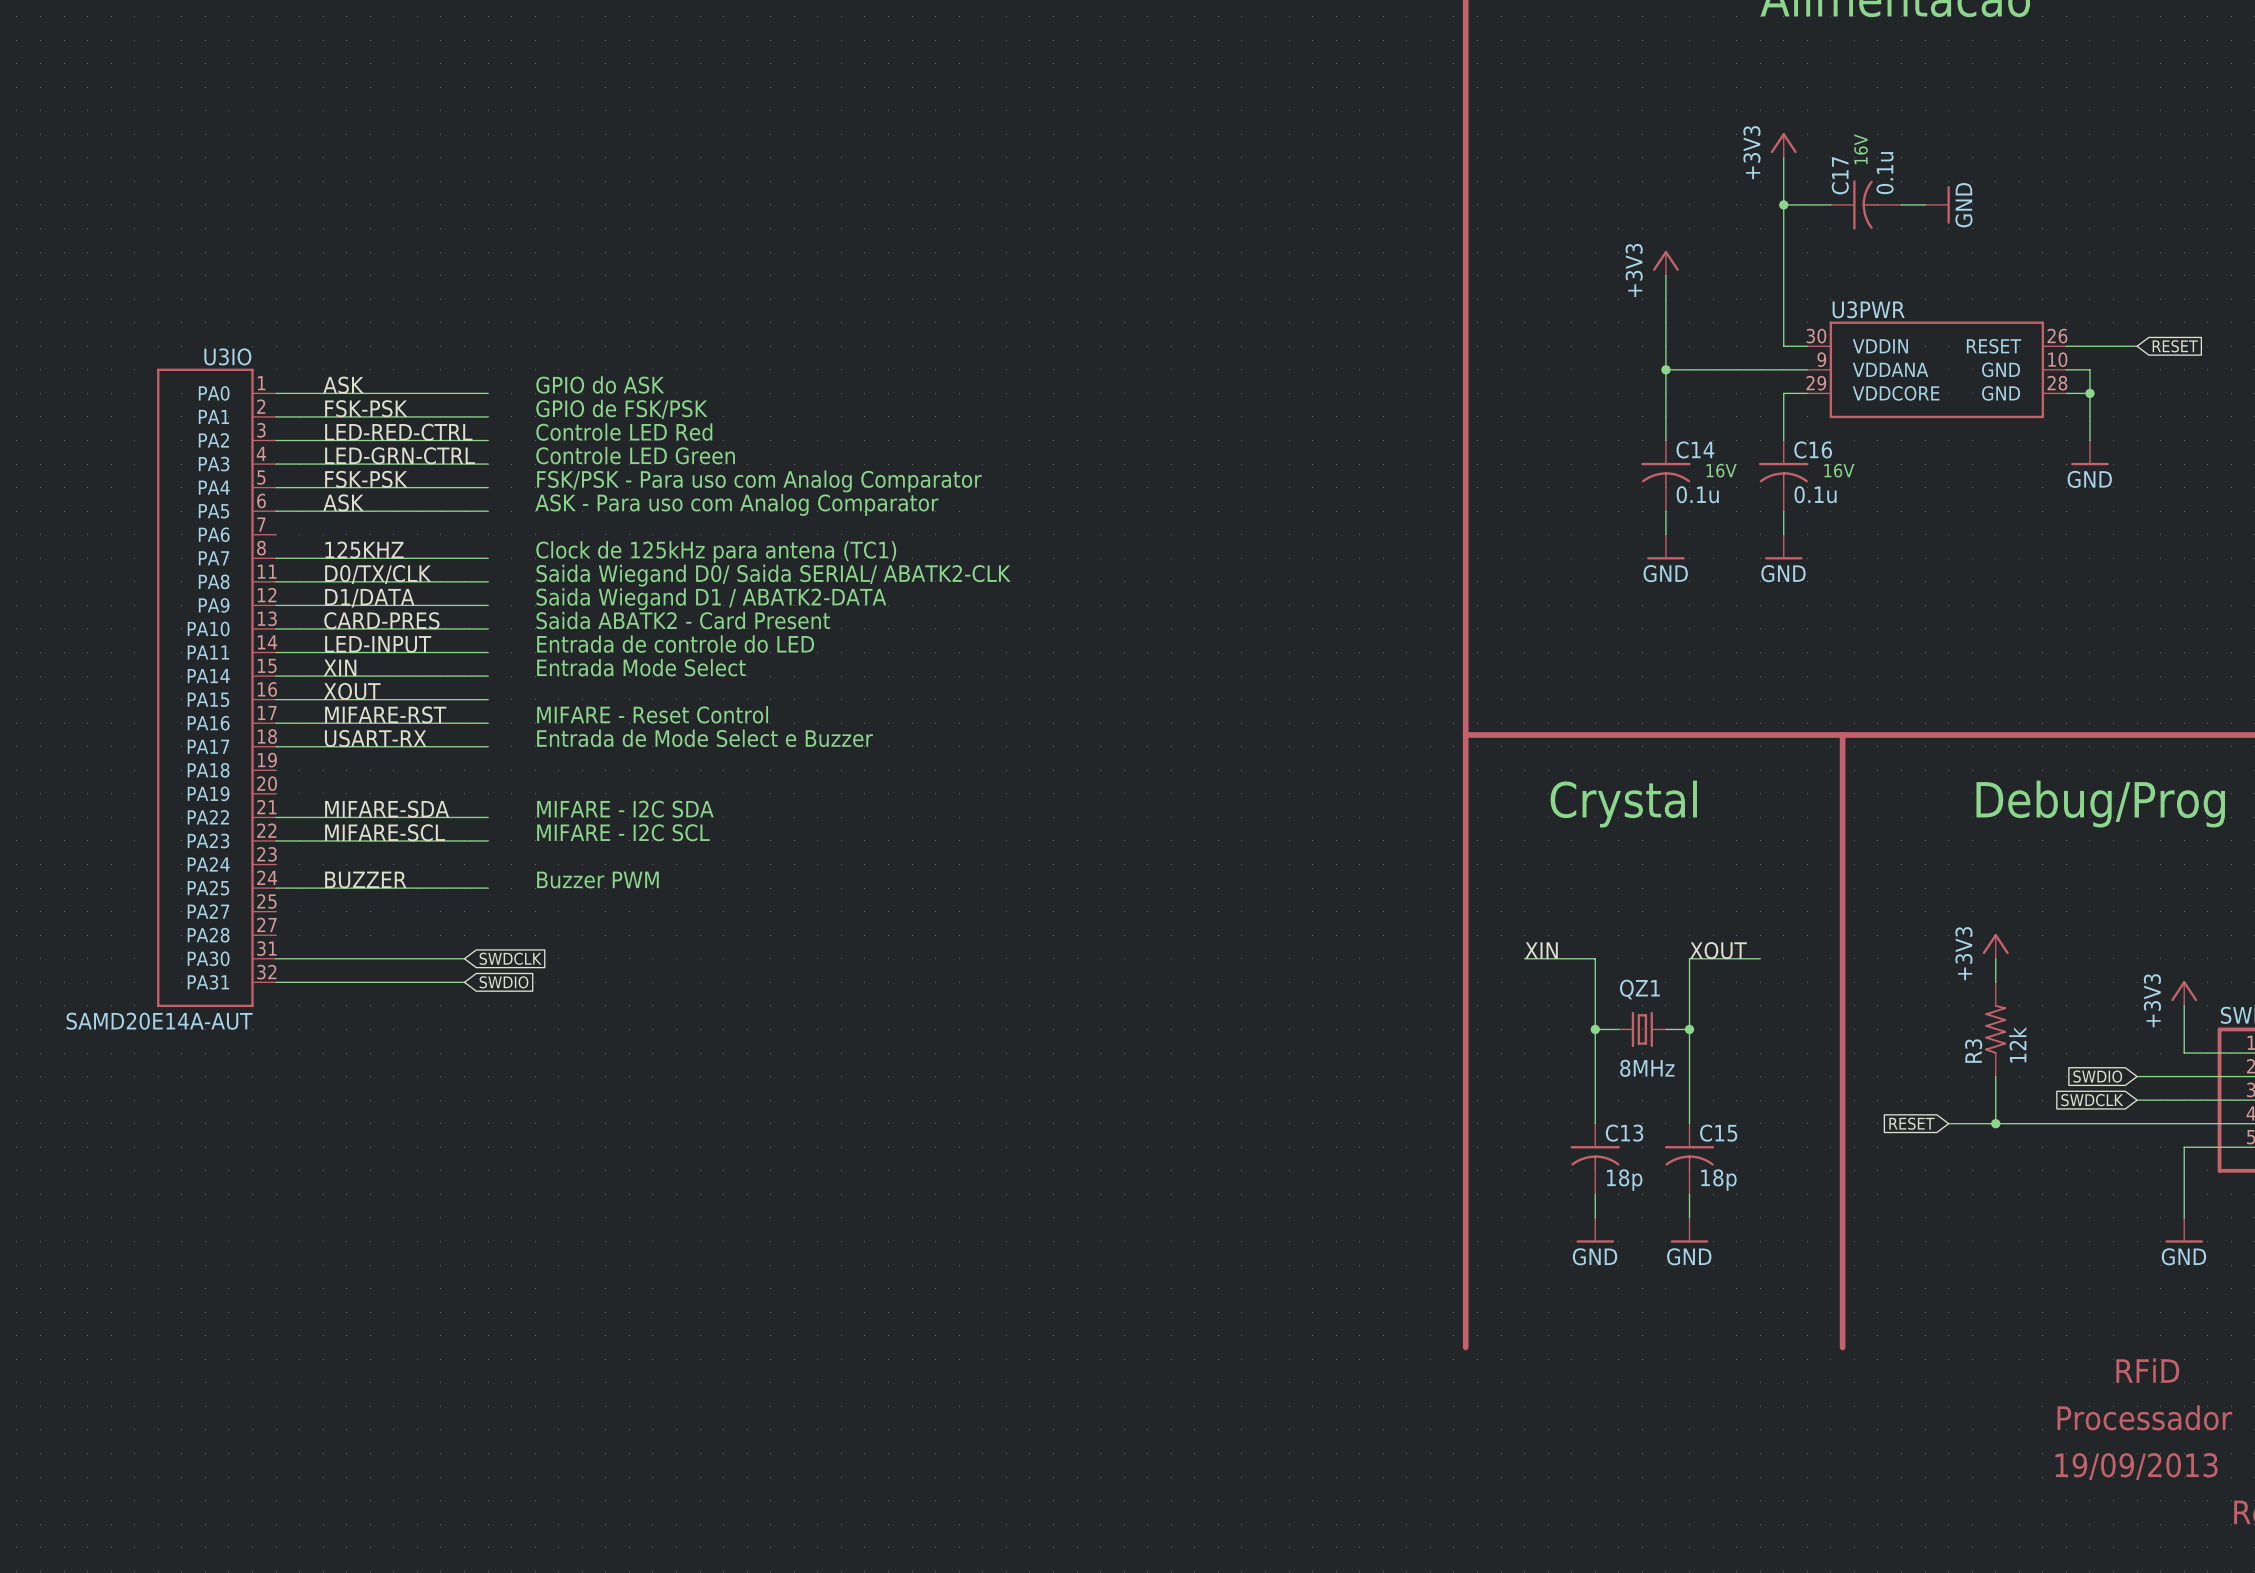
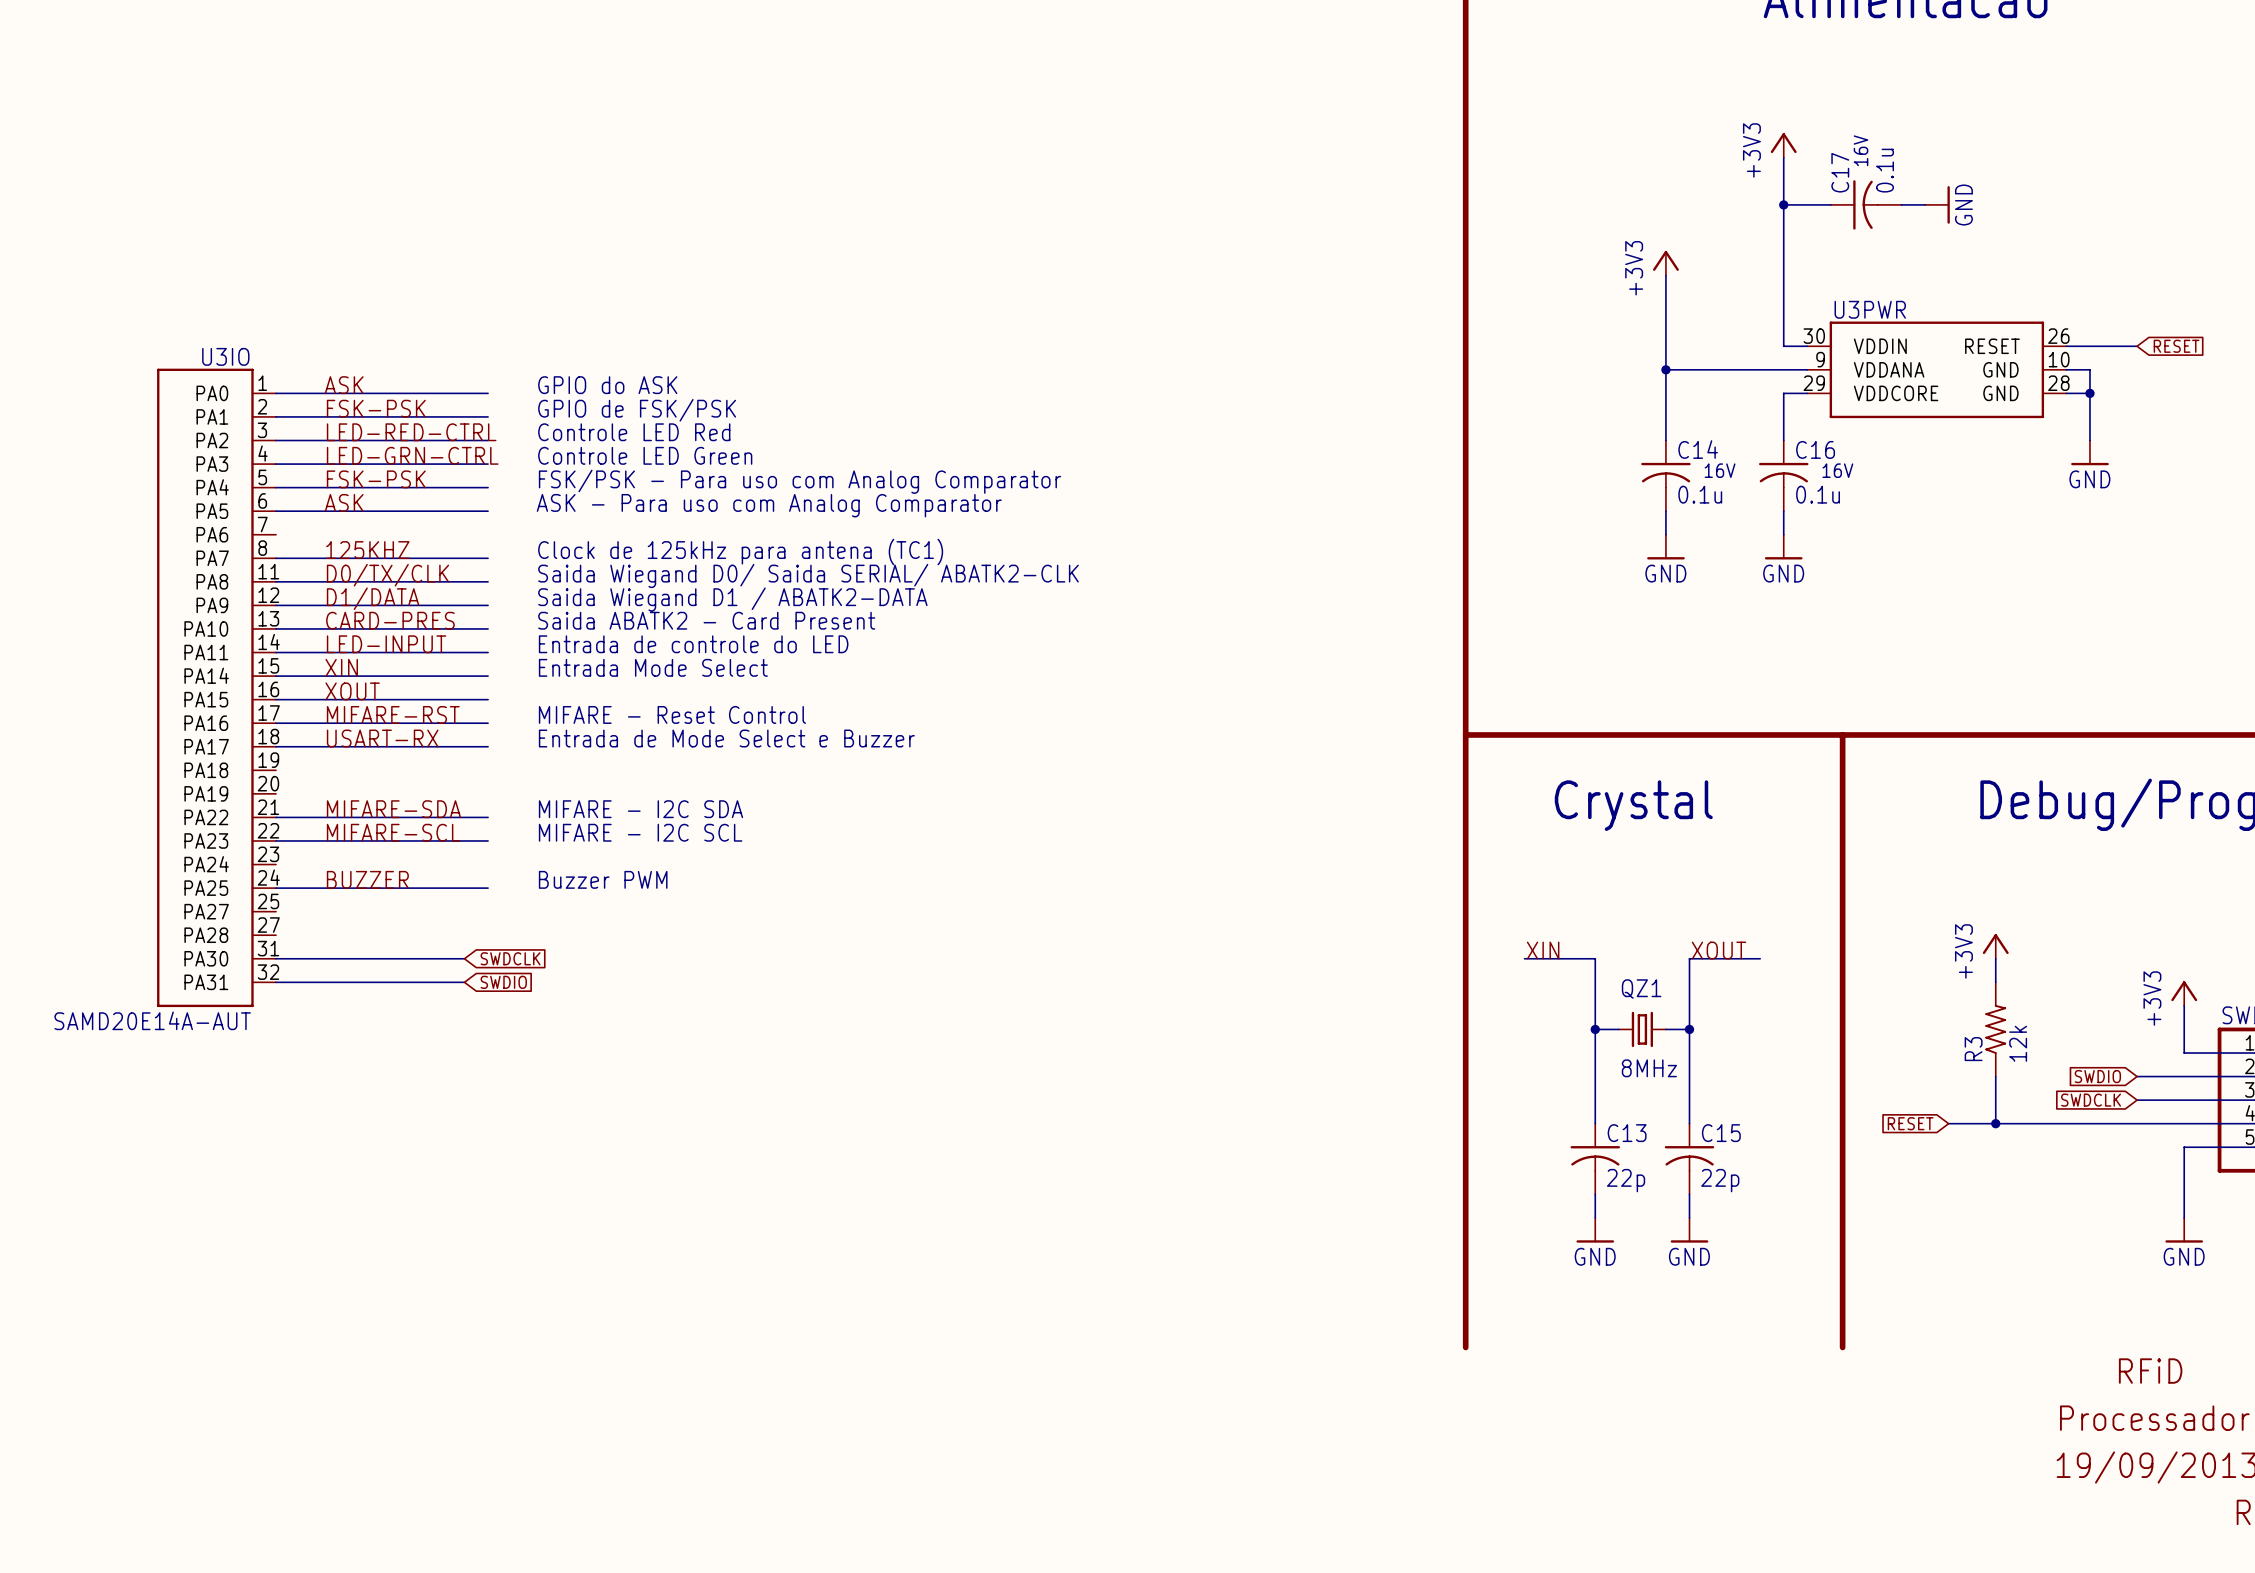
C13 value: 18p (1624, 1180) -> 22p (1626, 1180)
C15 value: 18p (1718, 1180) -> 22p (1720, 1180)

